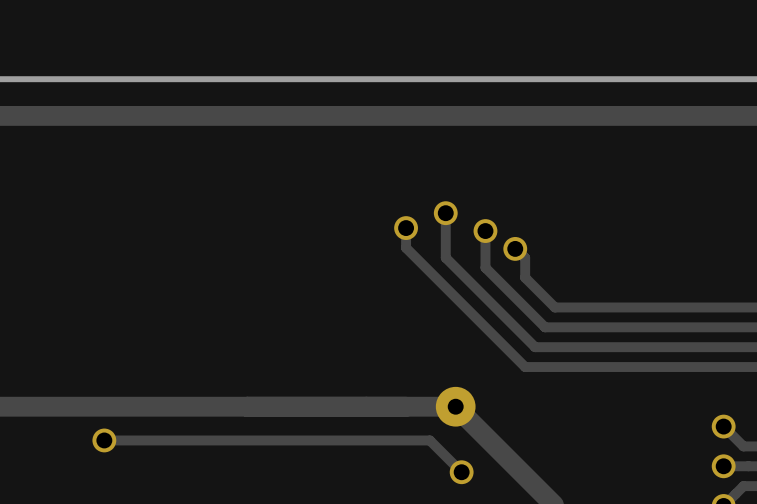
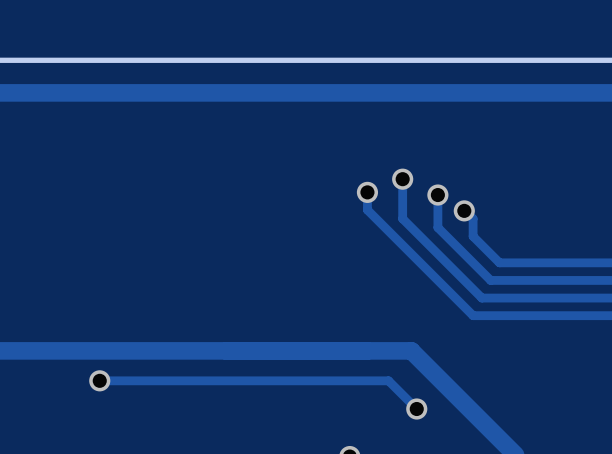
via: (455, 406) -> none

